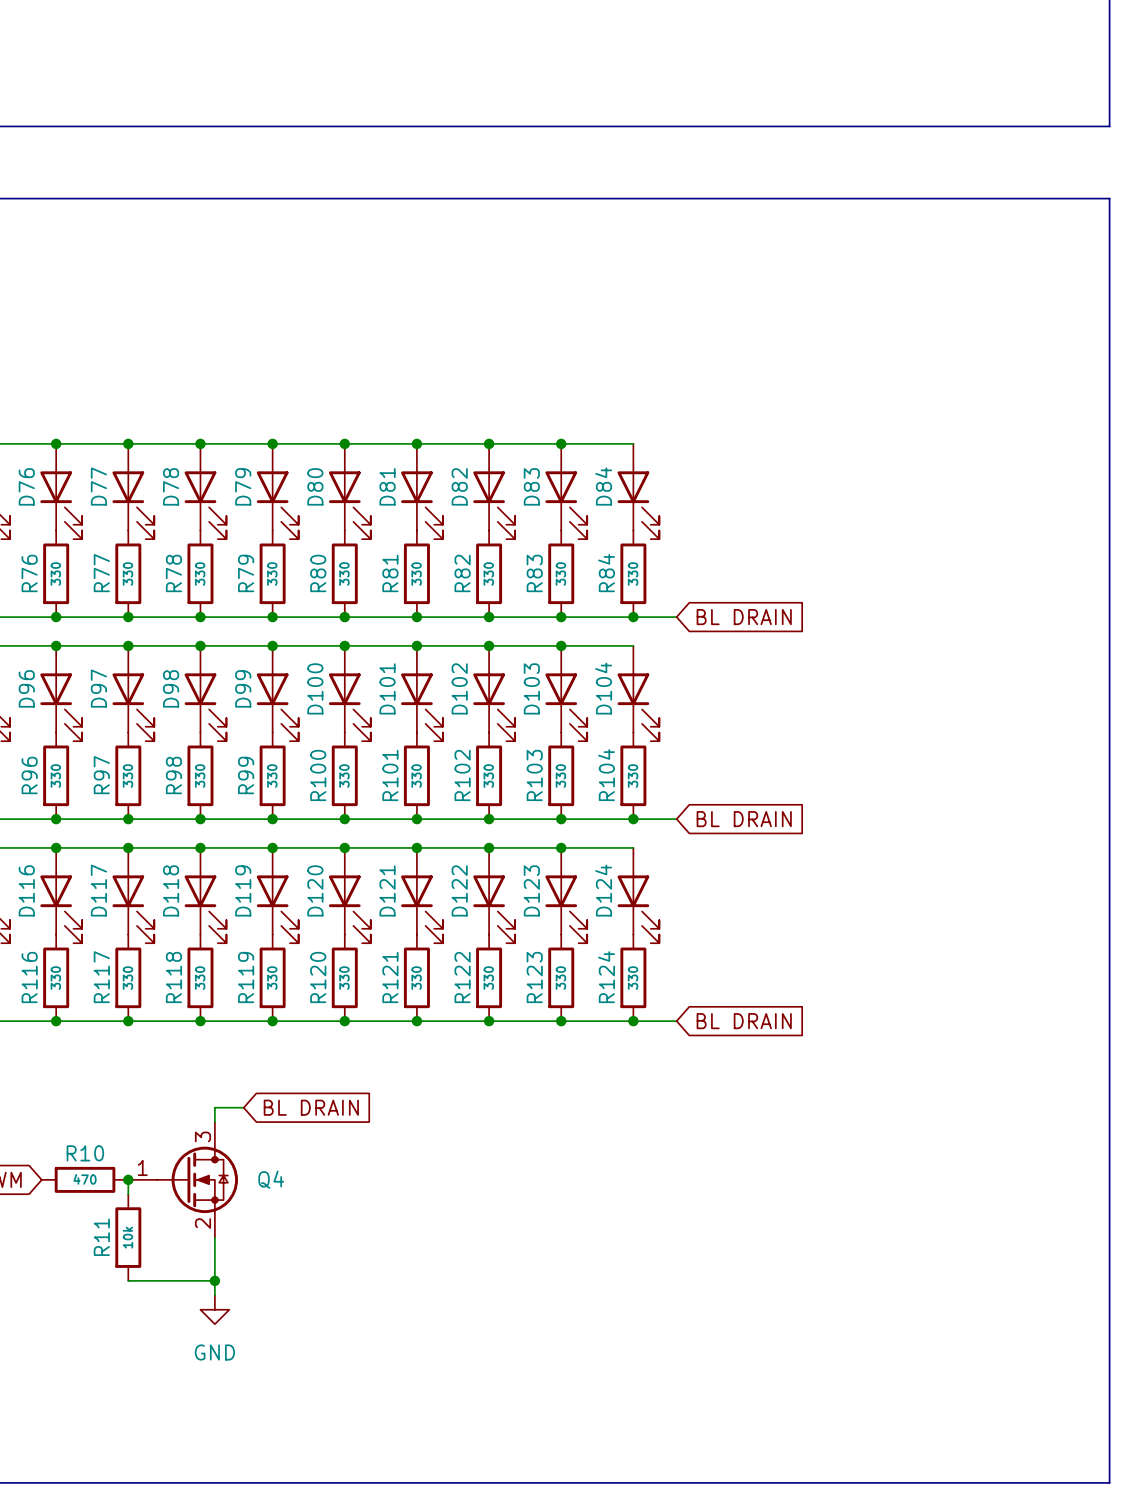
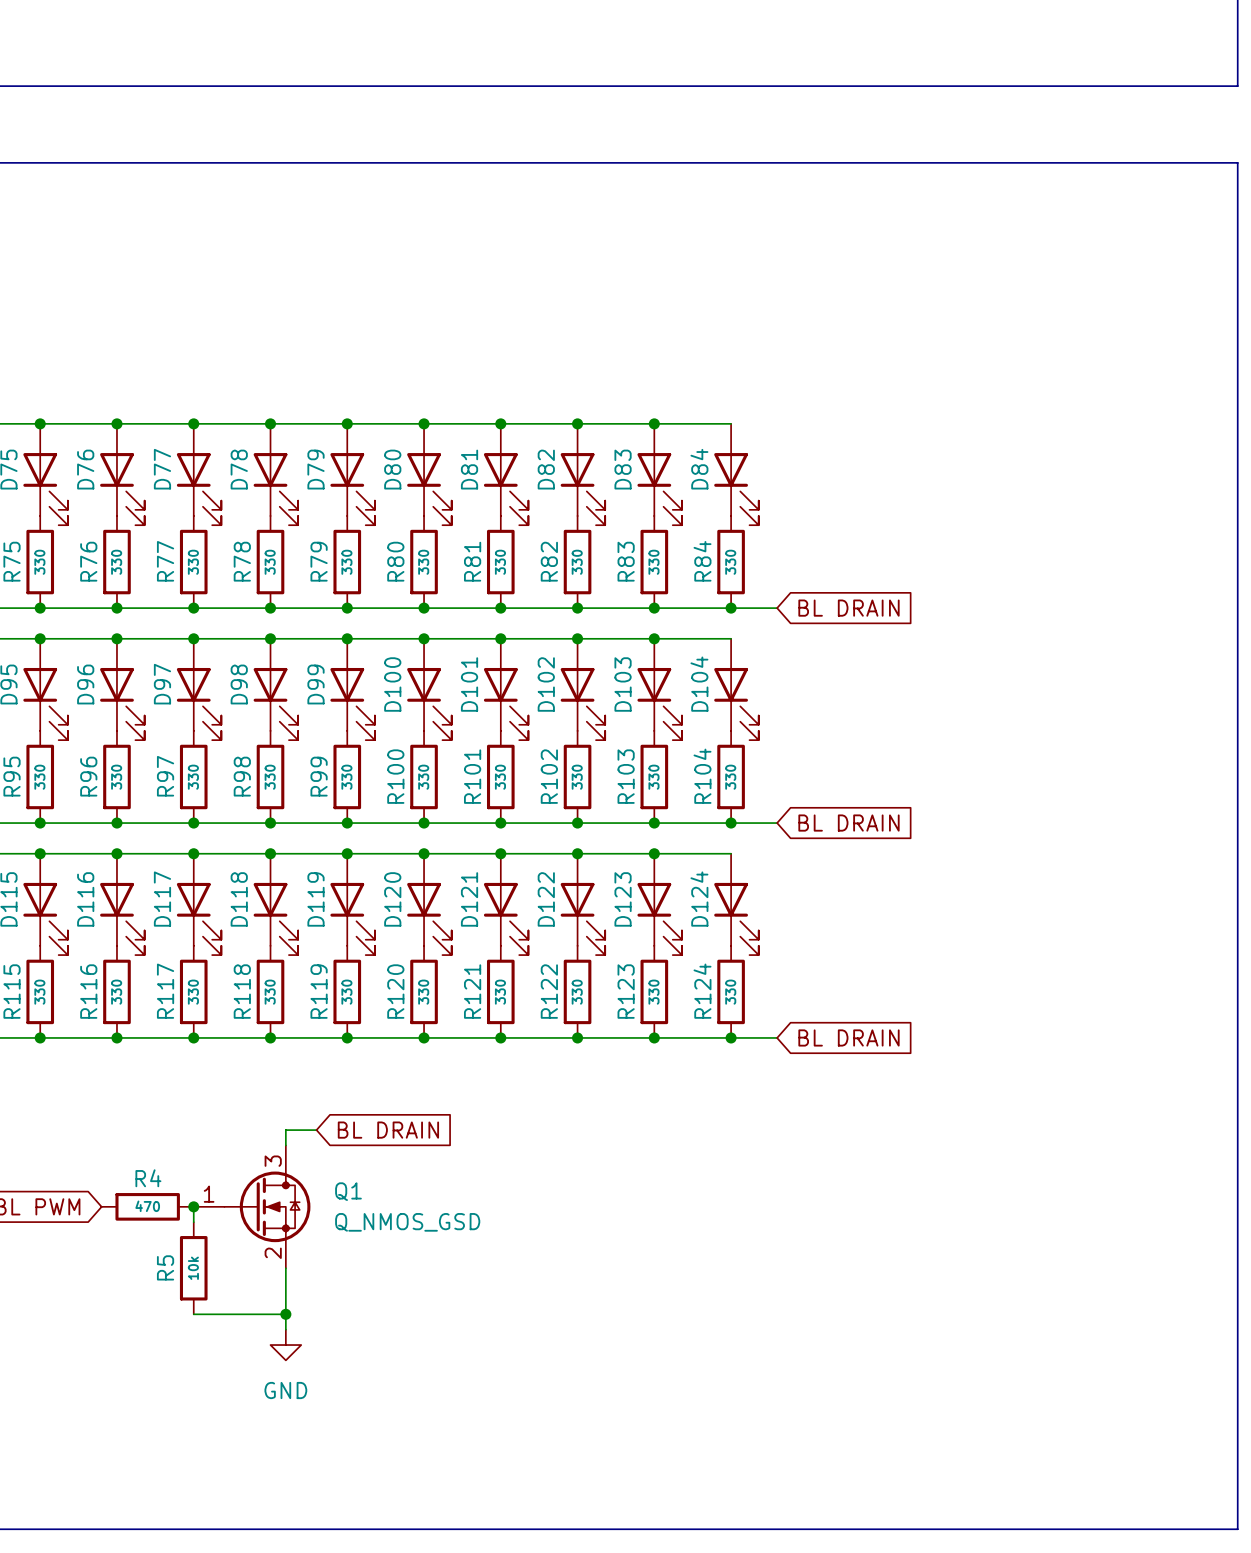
R10 name: R10 (85, 1153) -> R4 (148, 1178)
Q4 name: Q4 (271, 1179) -> Q1 (348, 1191)
Q4 value: none -> Q_NMOS_GSD (407, 1222)
R11 name: R11 (101, 1237) -> R5 (165, 1267)

